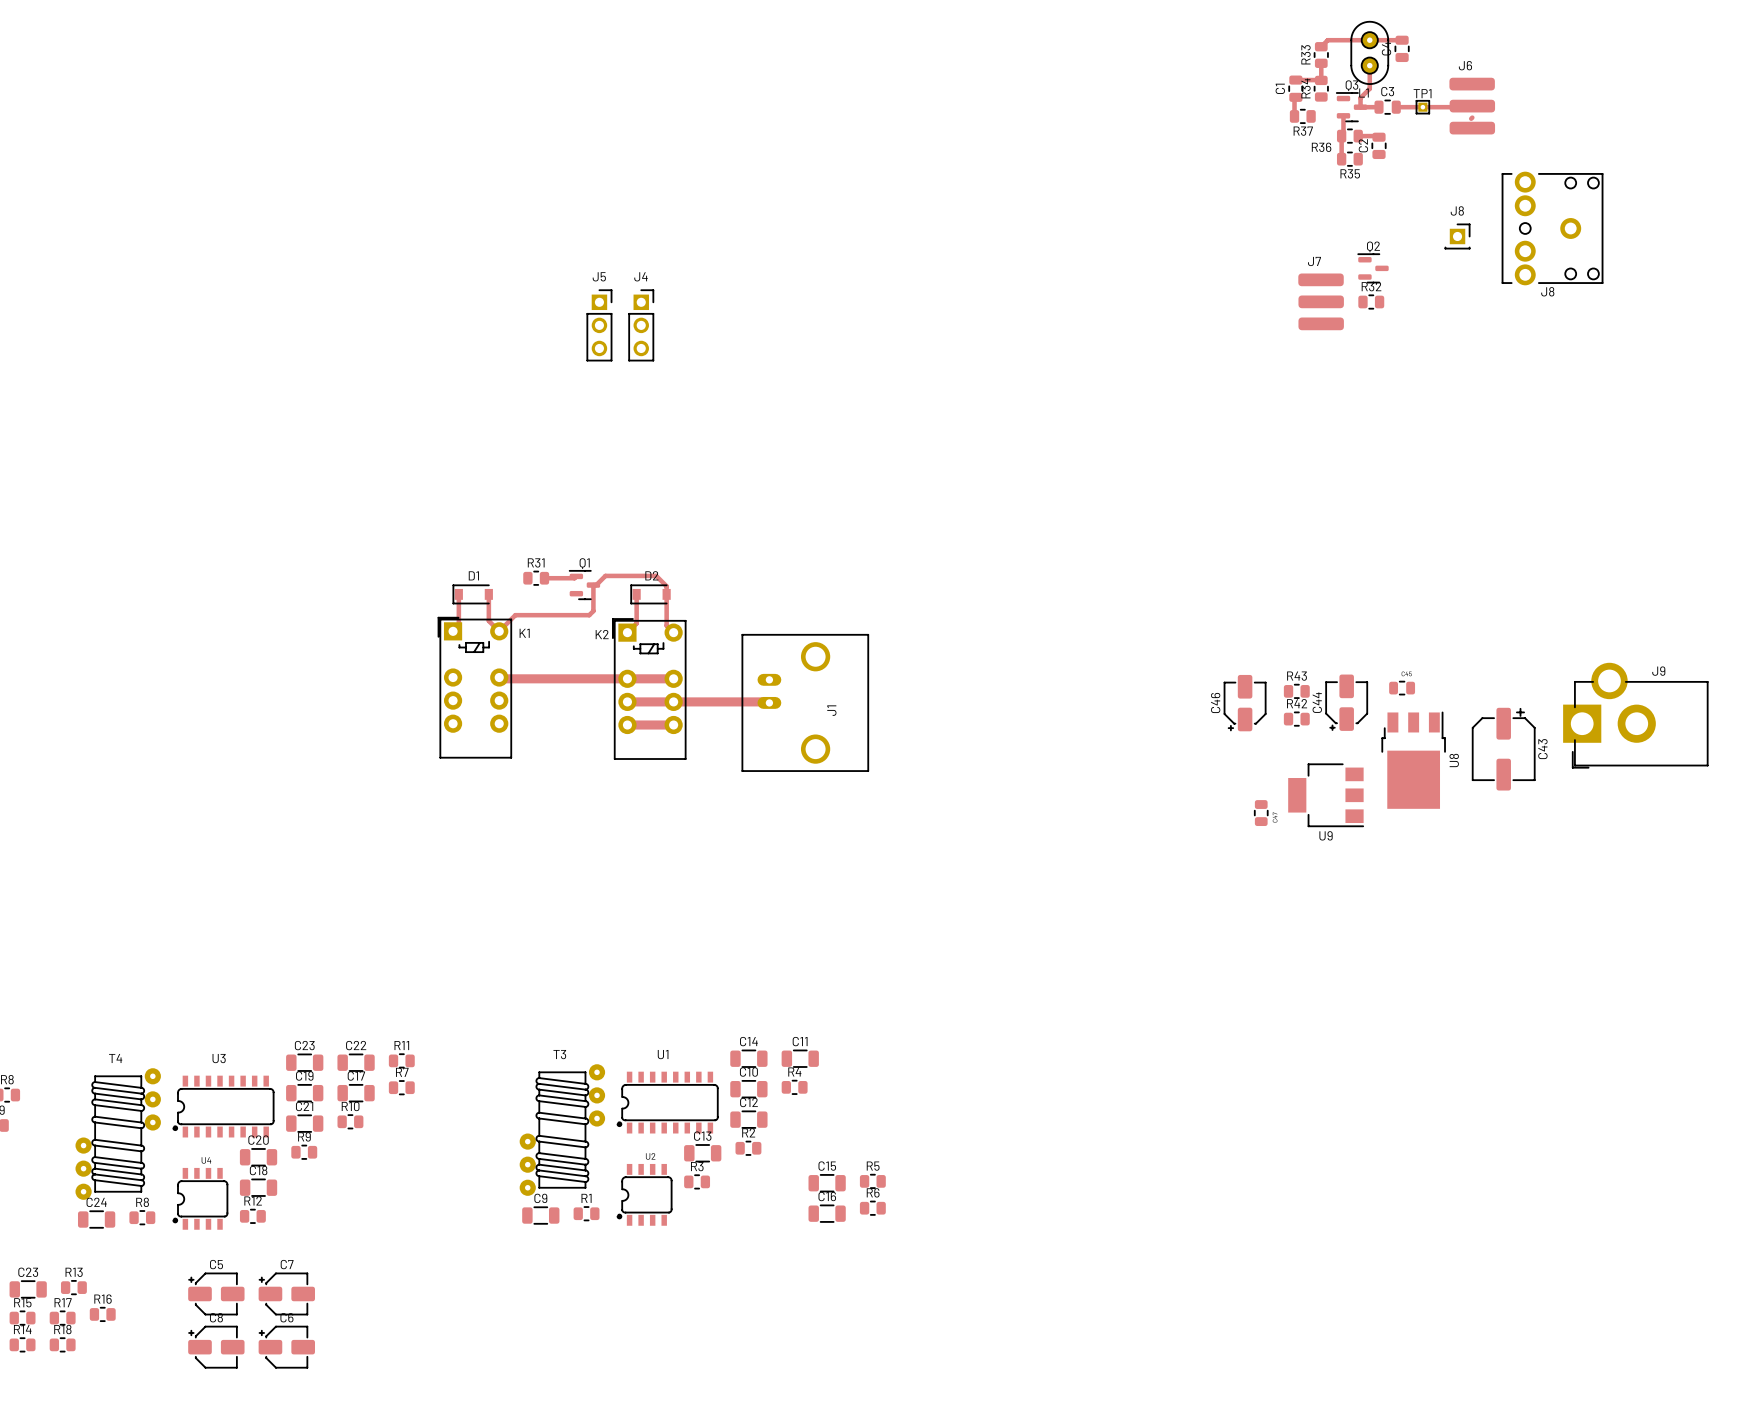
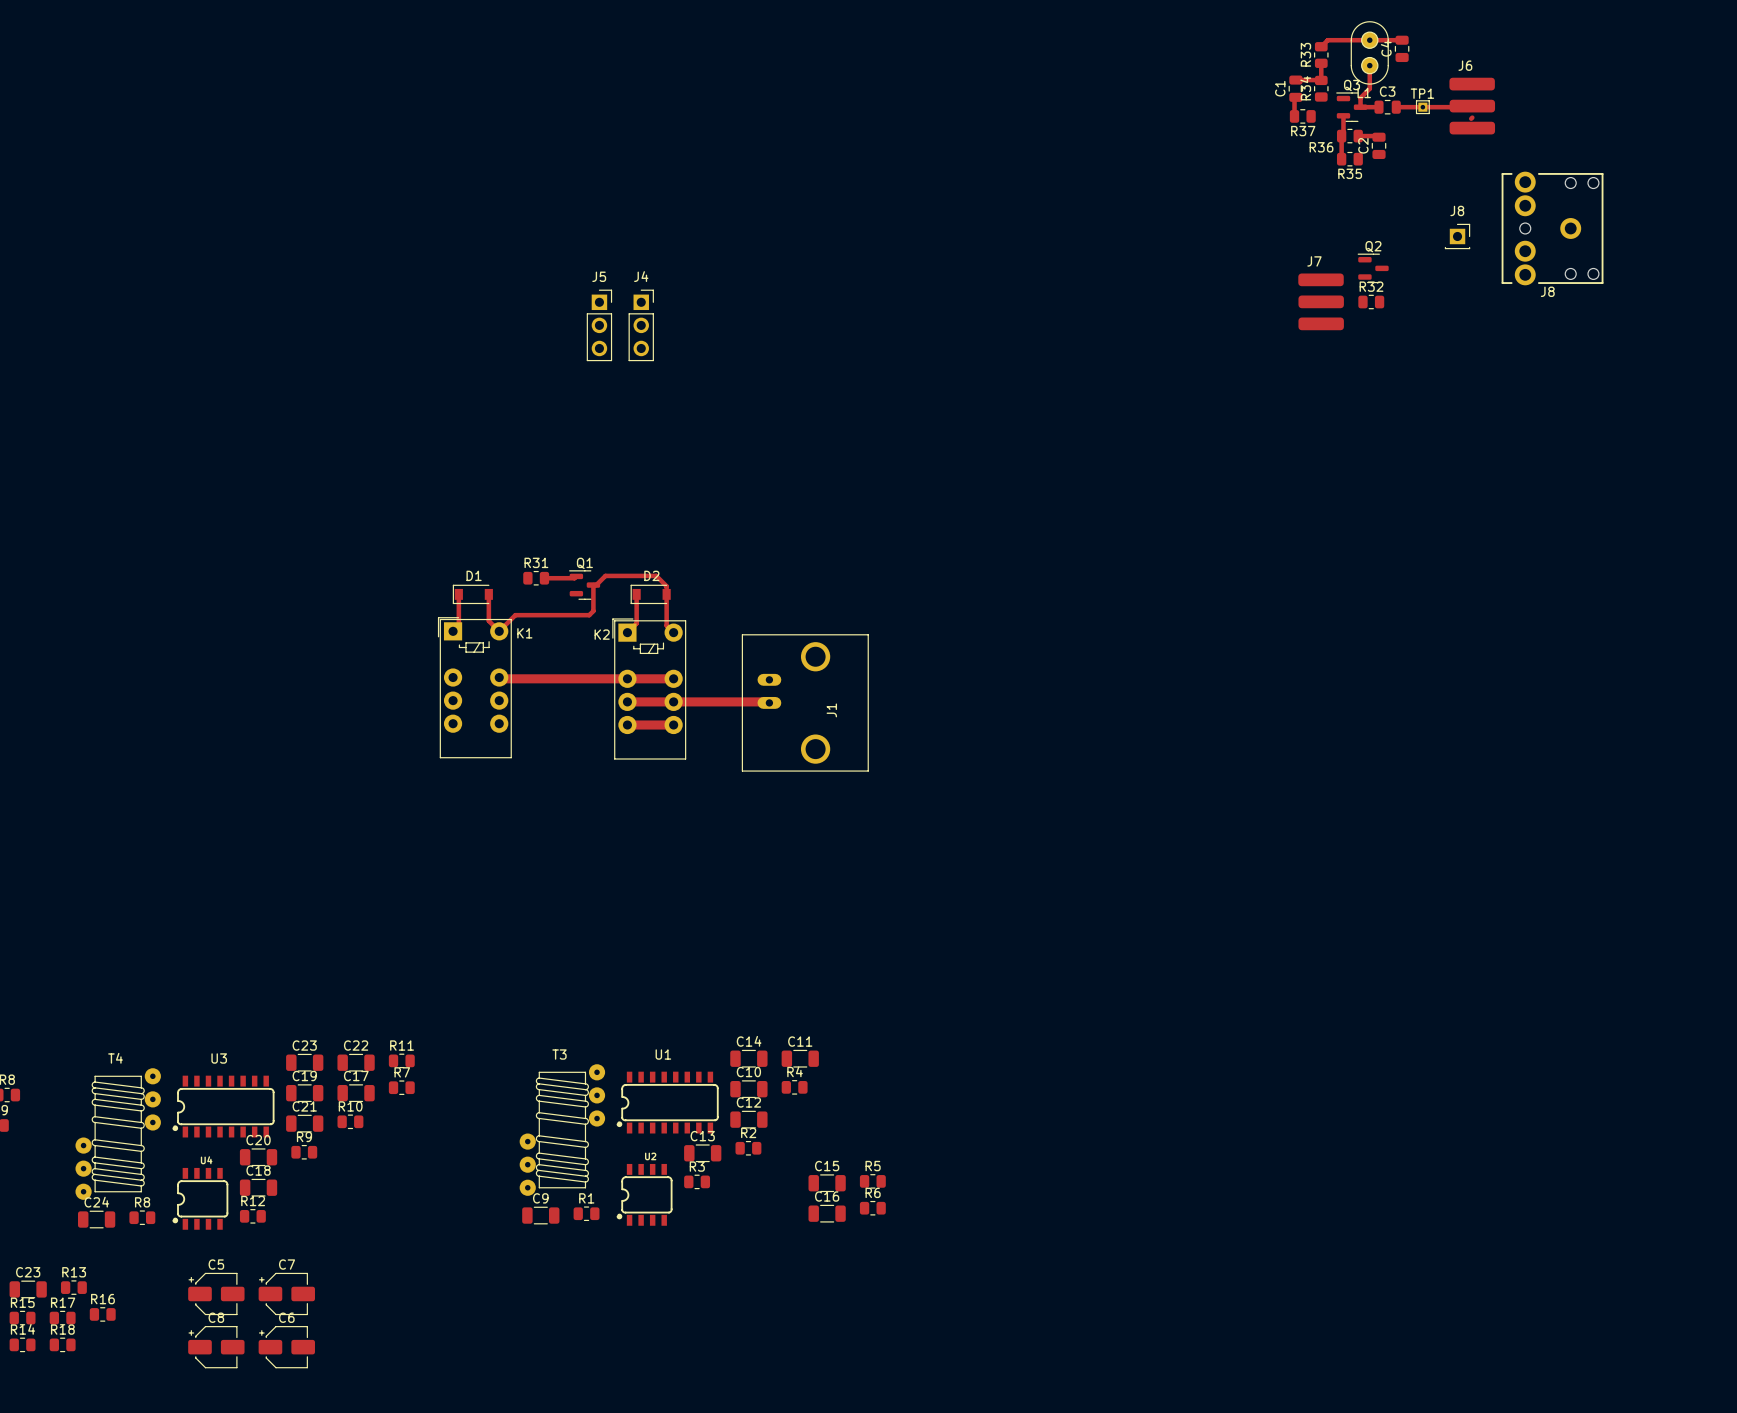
part: (1402, 688) -> none
R43: (1296, 691) -> none
C44: (1346, 702) -> none
C46: (1245, 703) -> none
J9: (1635, 715) -> none
R42: (1296, 719) -> none
C43: (1503, 749) -> none
U8: (1413, 760) -> none
U9: (1325, 795) -> none
part: (1261, 813) -> none

